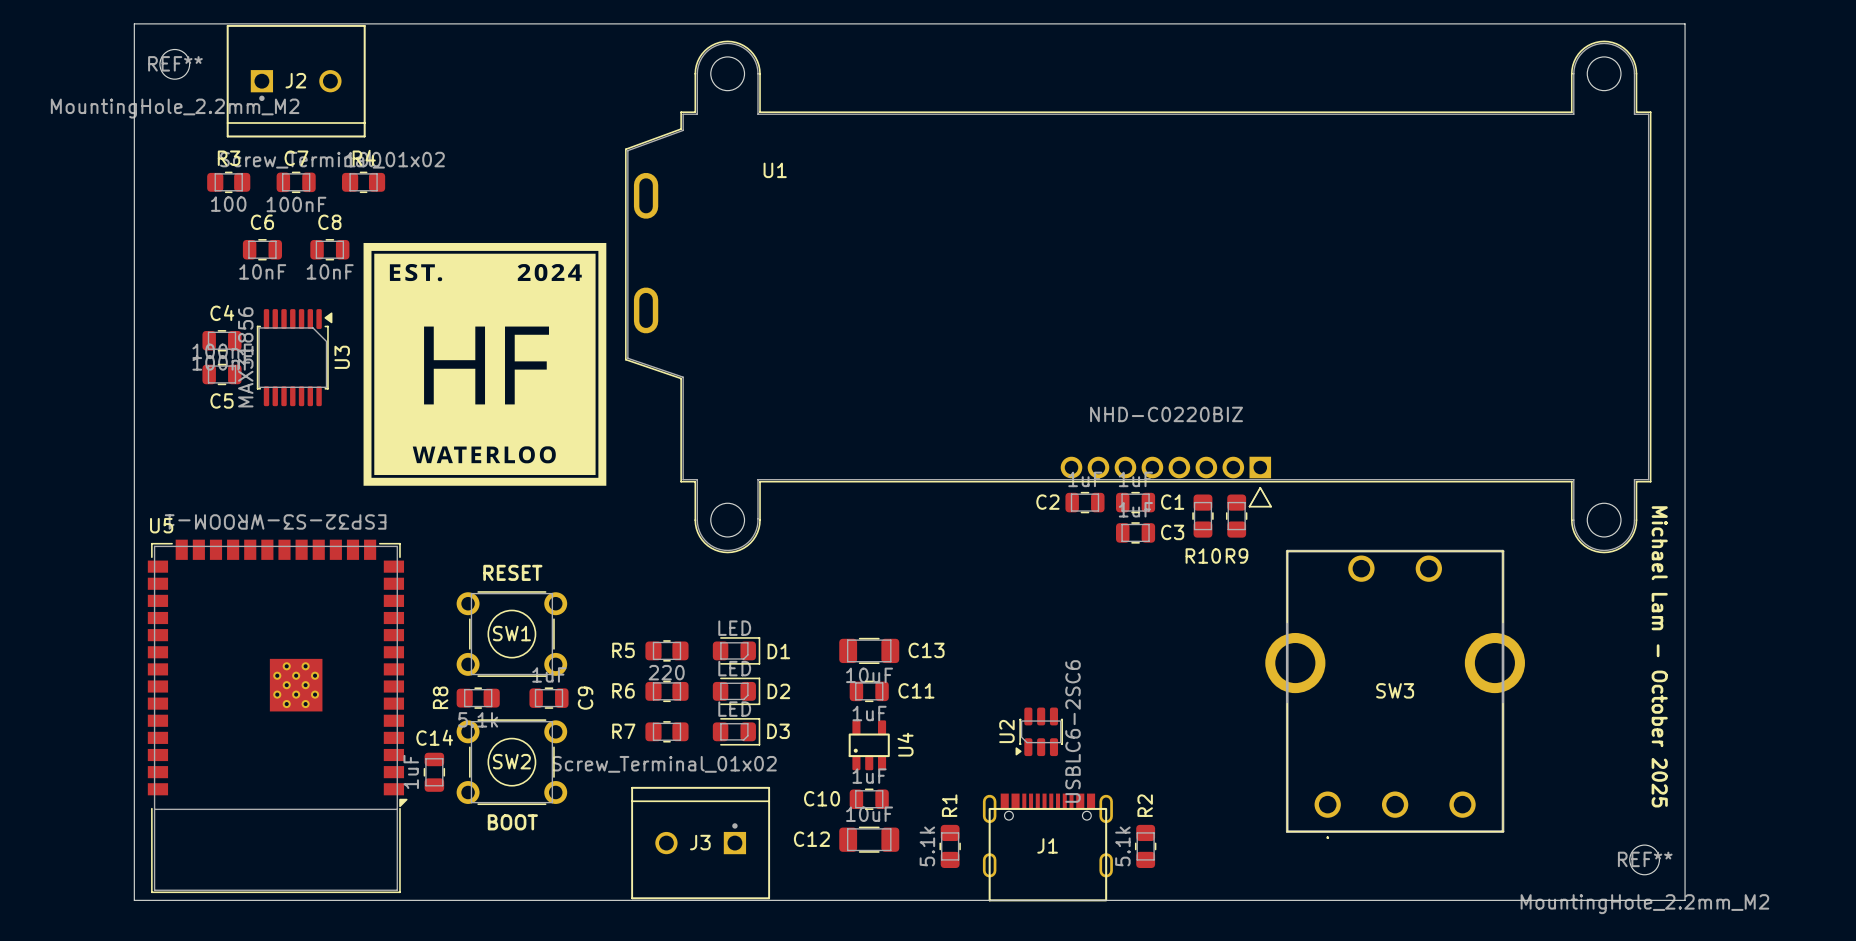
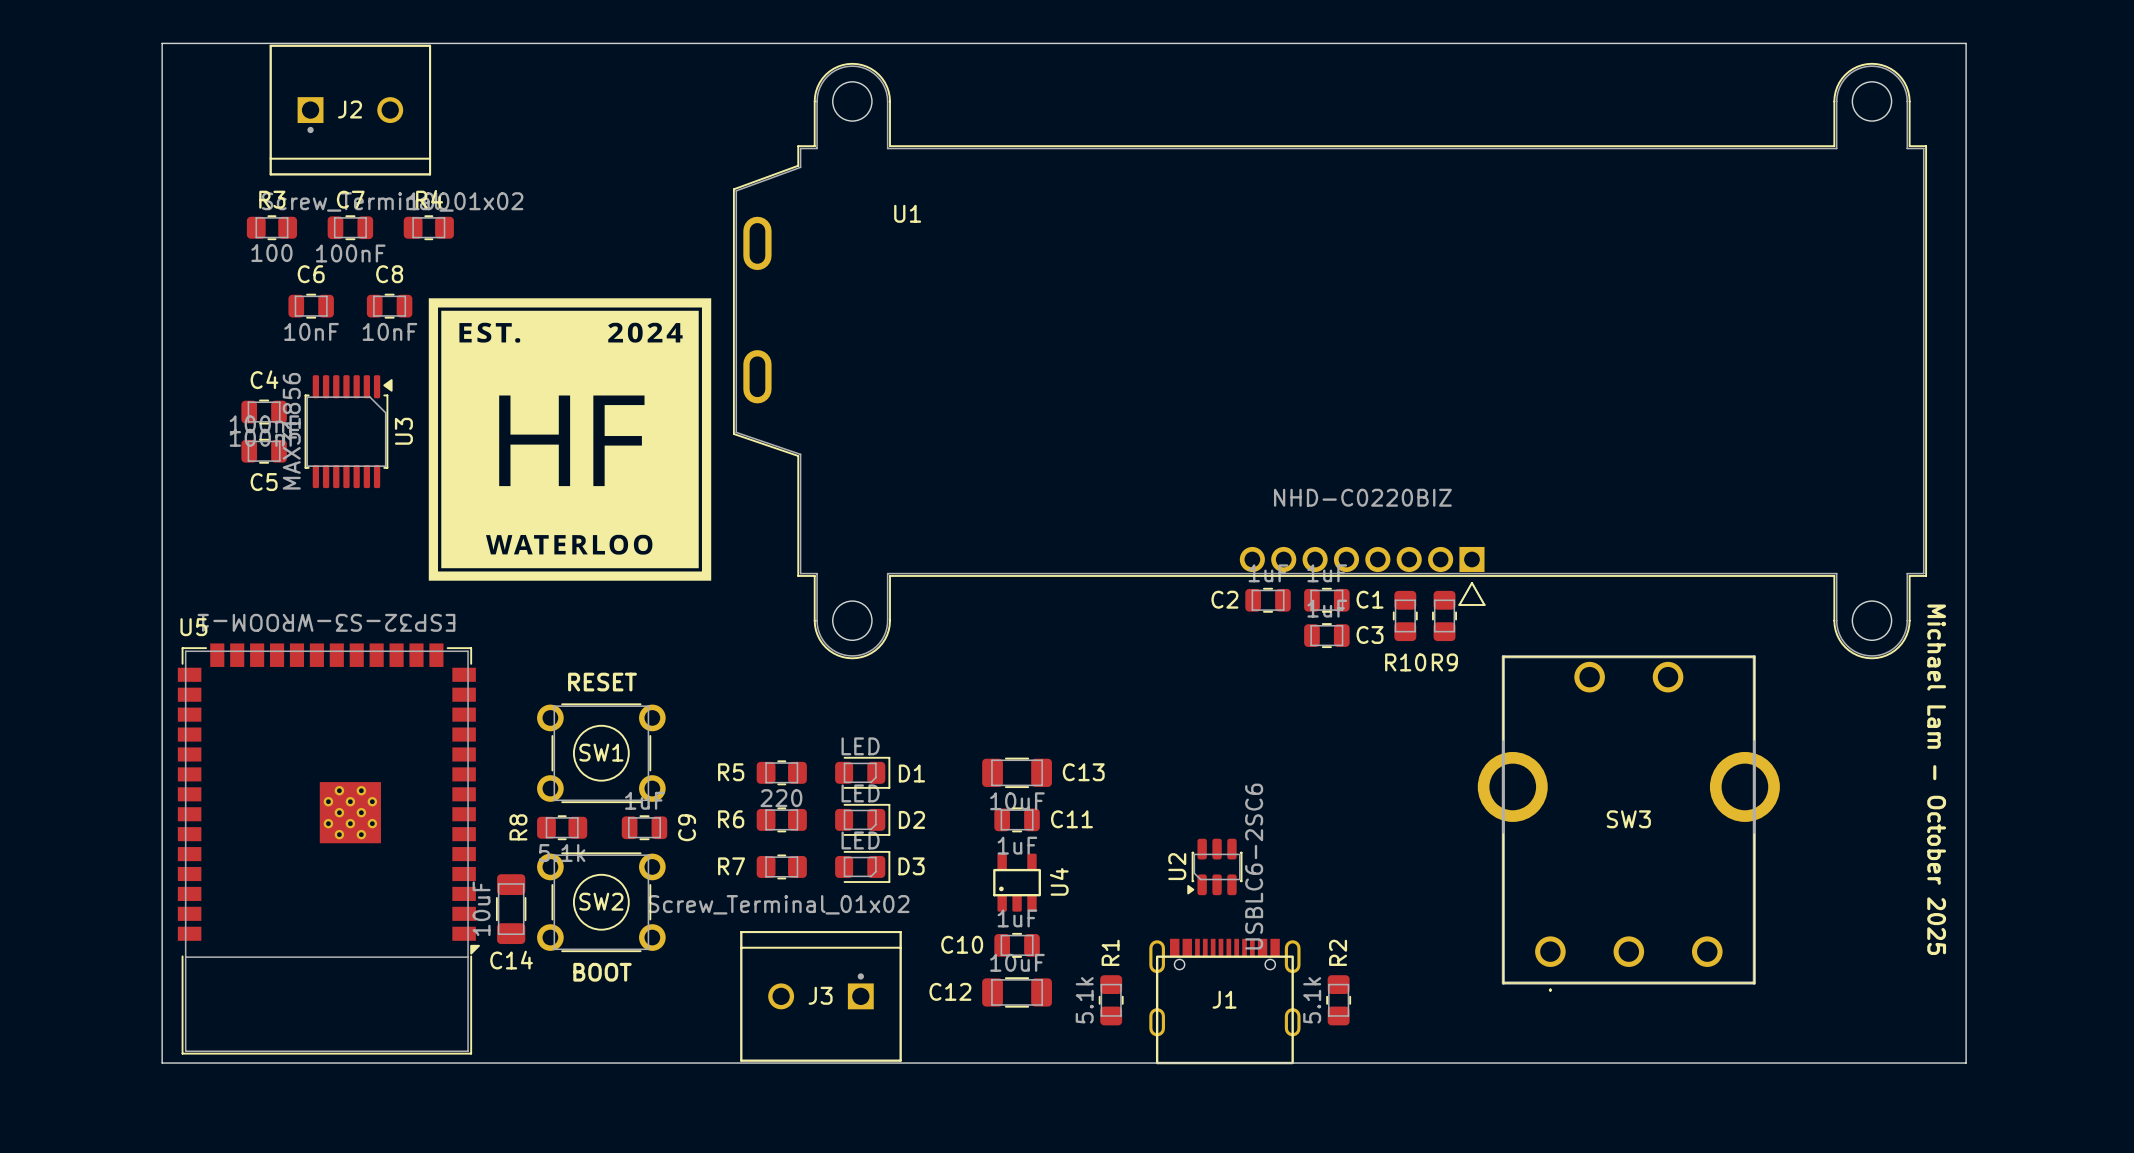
REF**: MountingHole_2.2mm_M2 (174, 64) -> none
C14 name position: C14 (434, 737) -> C14 (511, 960)
C14 footprint: [423, 752, 446, 792] -> [495, 874, 527, 945]
C14 value: 1uF (411, 771) -> 10uF (481, 908)
REF**: MountingHole_2.2mm_M2 (1644, 859) -> none

